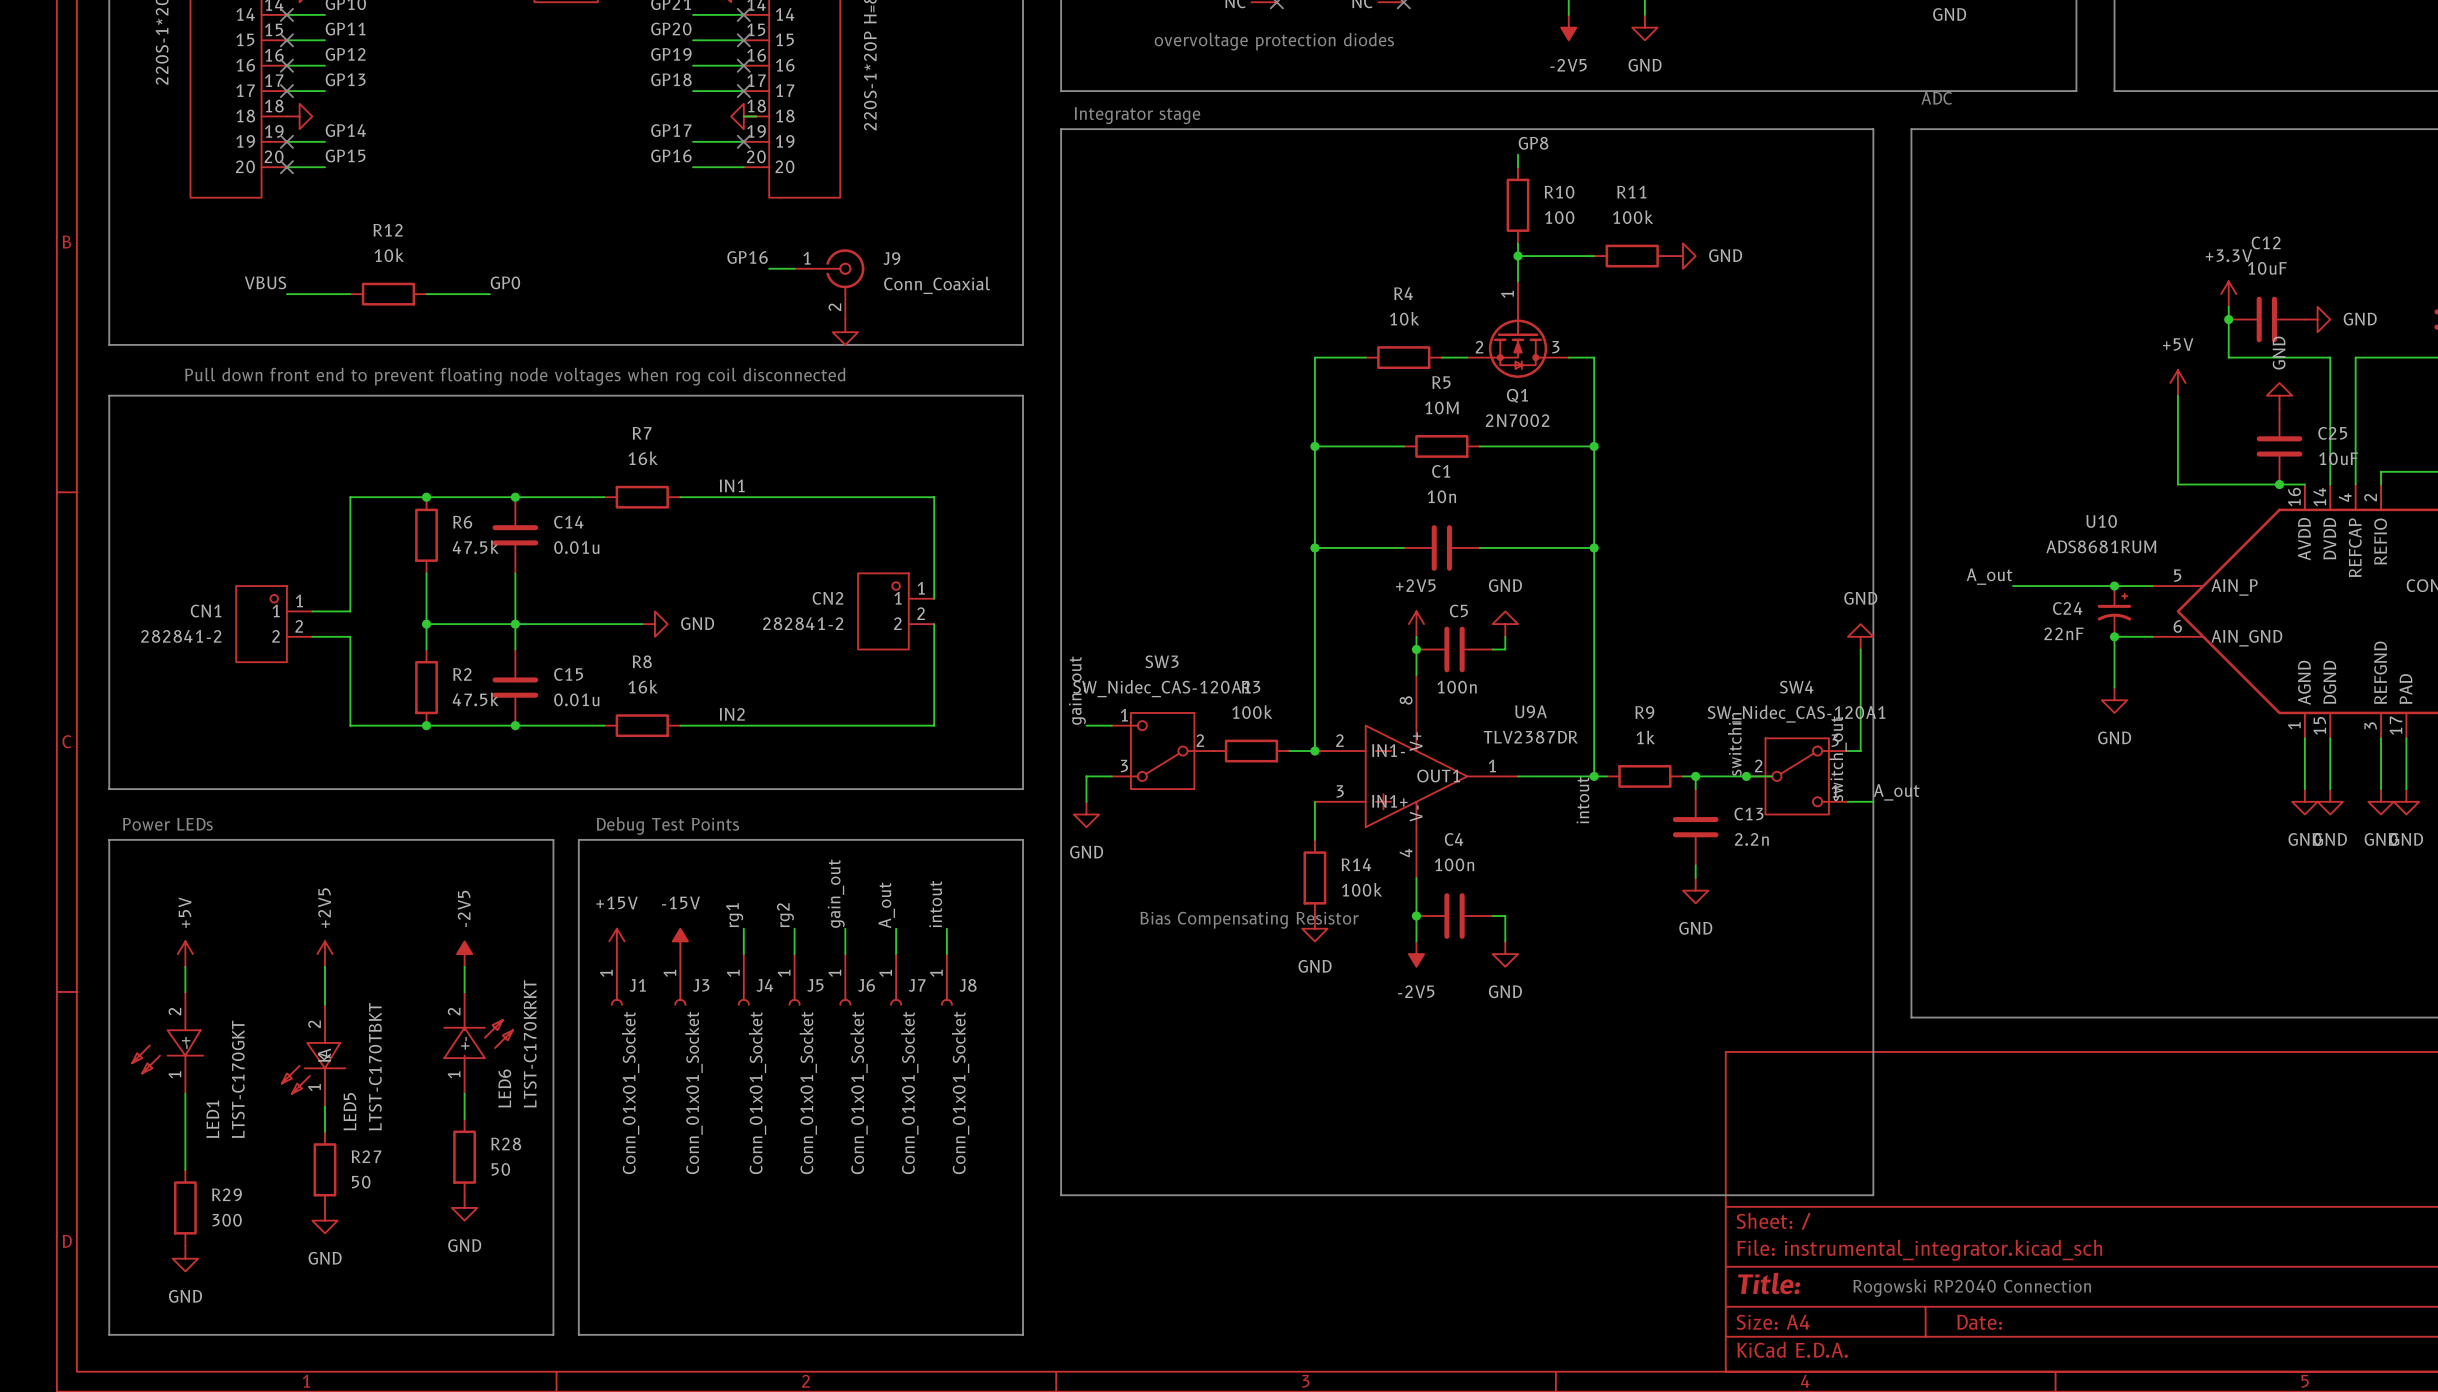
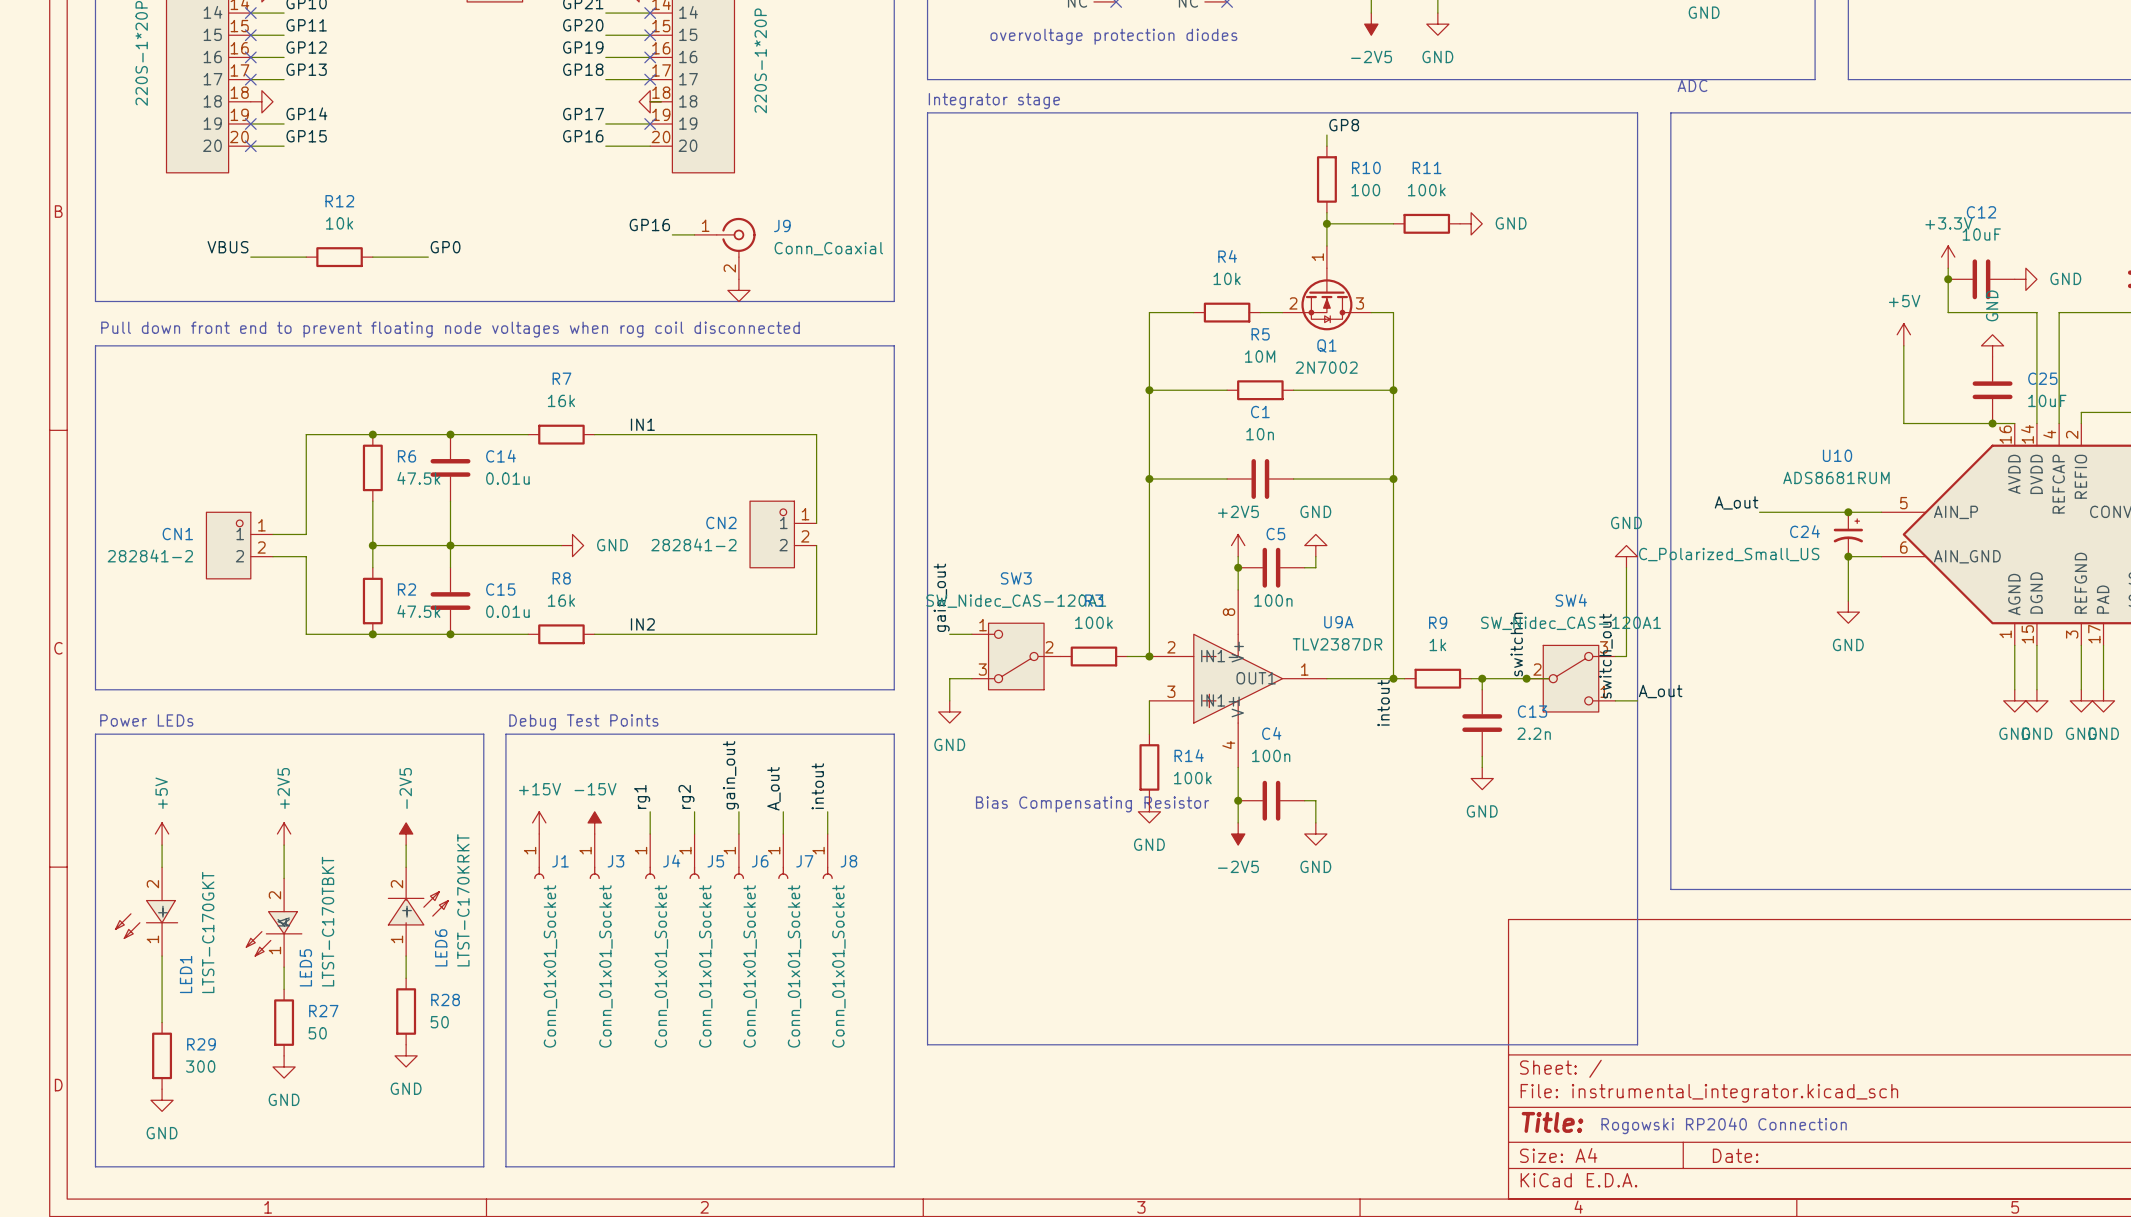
C24 value: 22nF (2063, 633) -> C_Polarized_Small_US (1729, 554)

